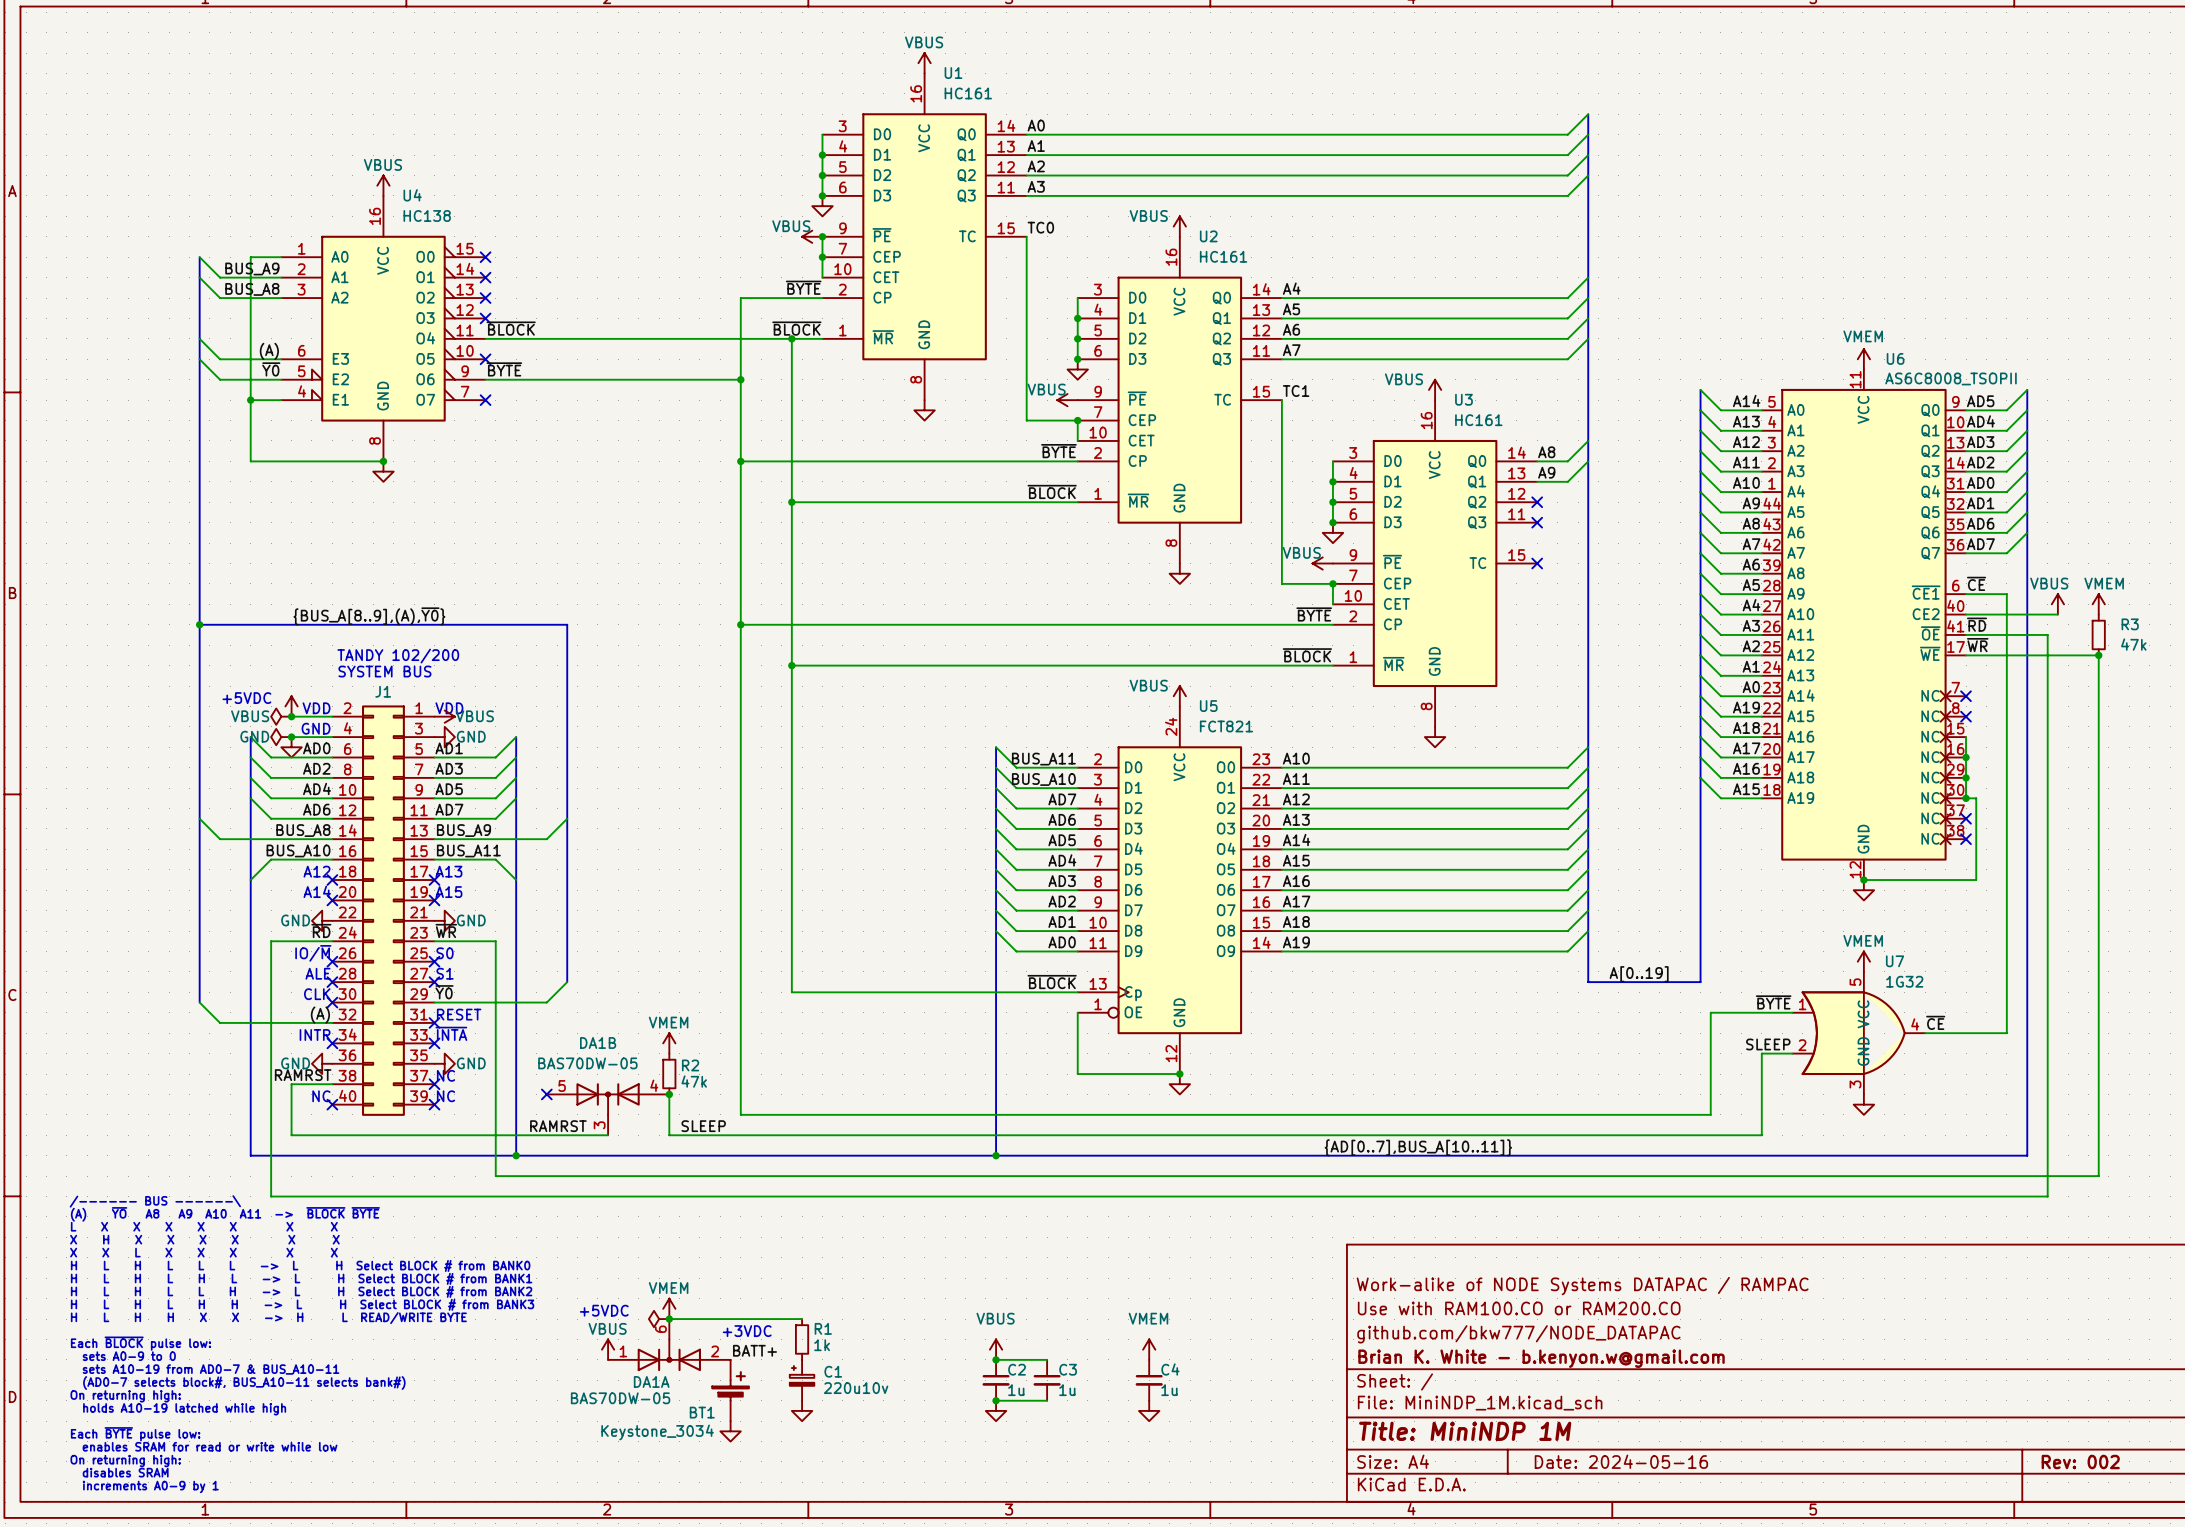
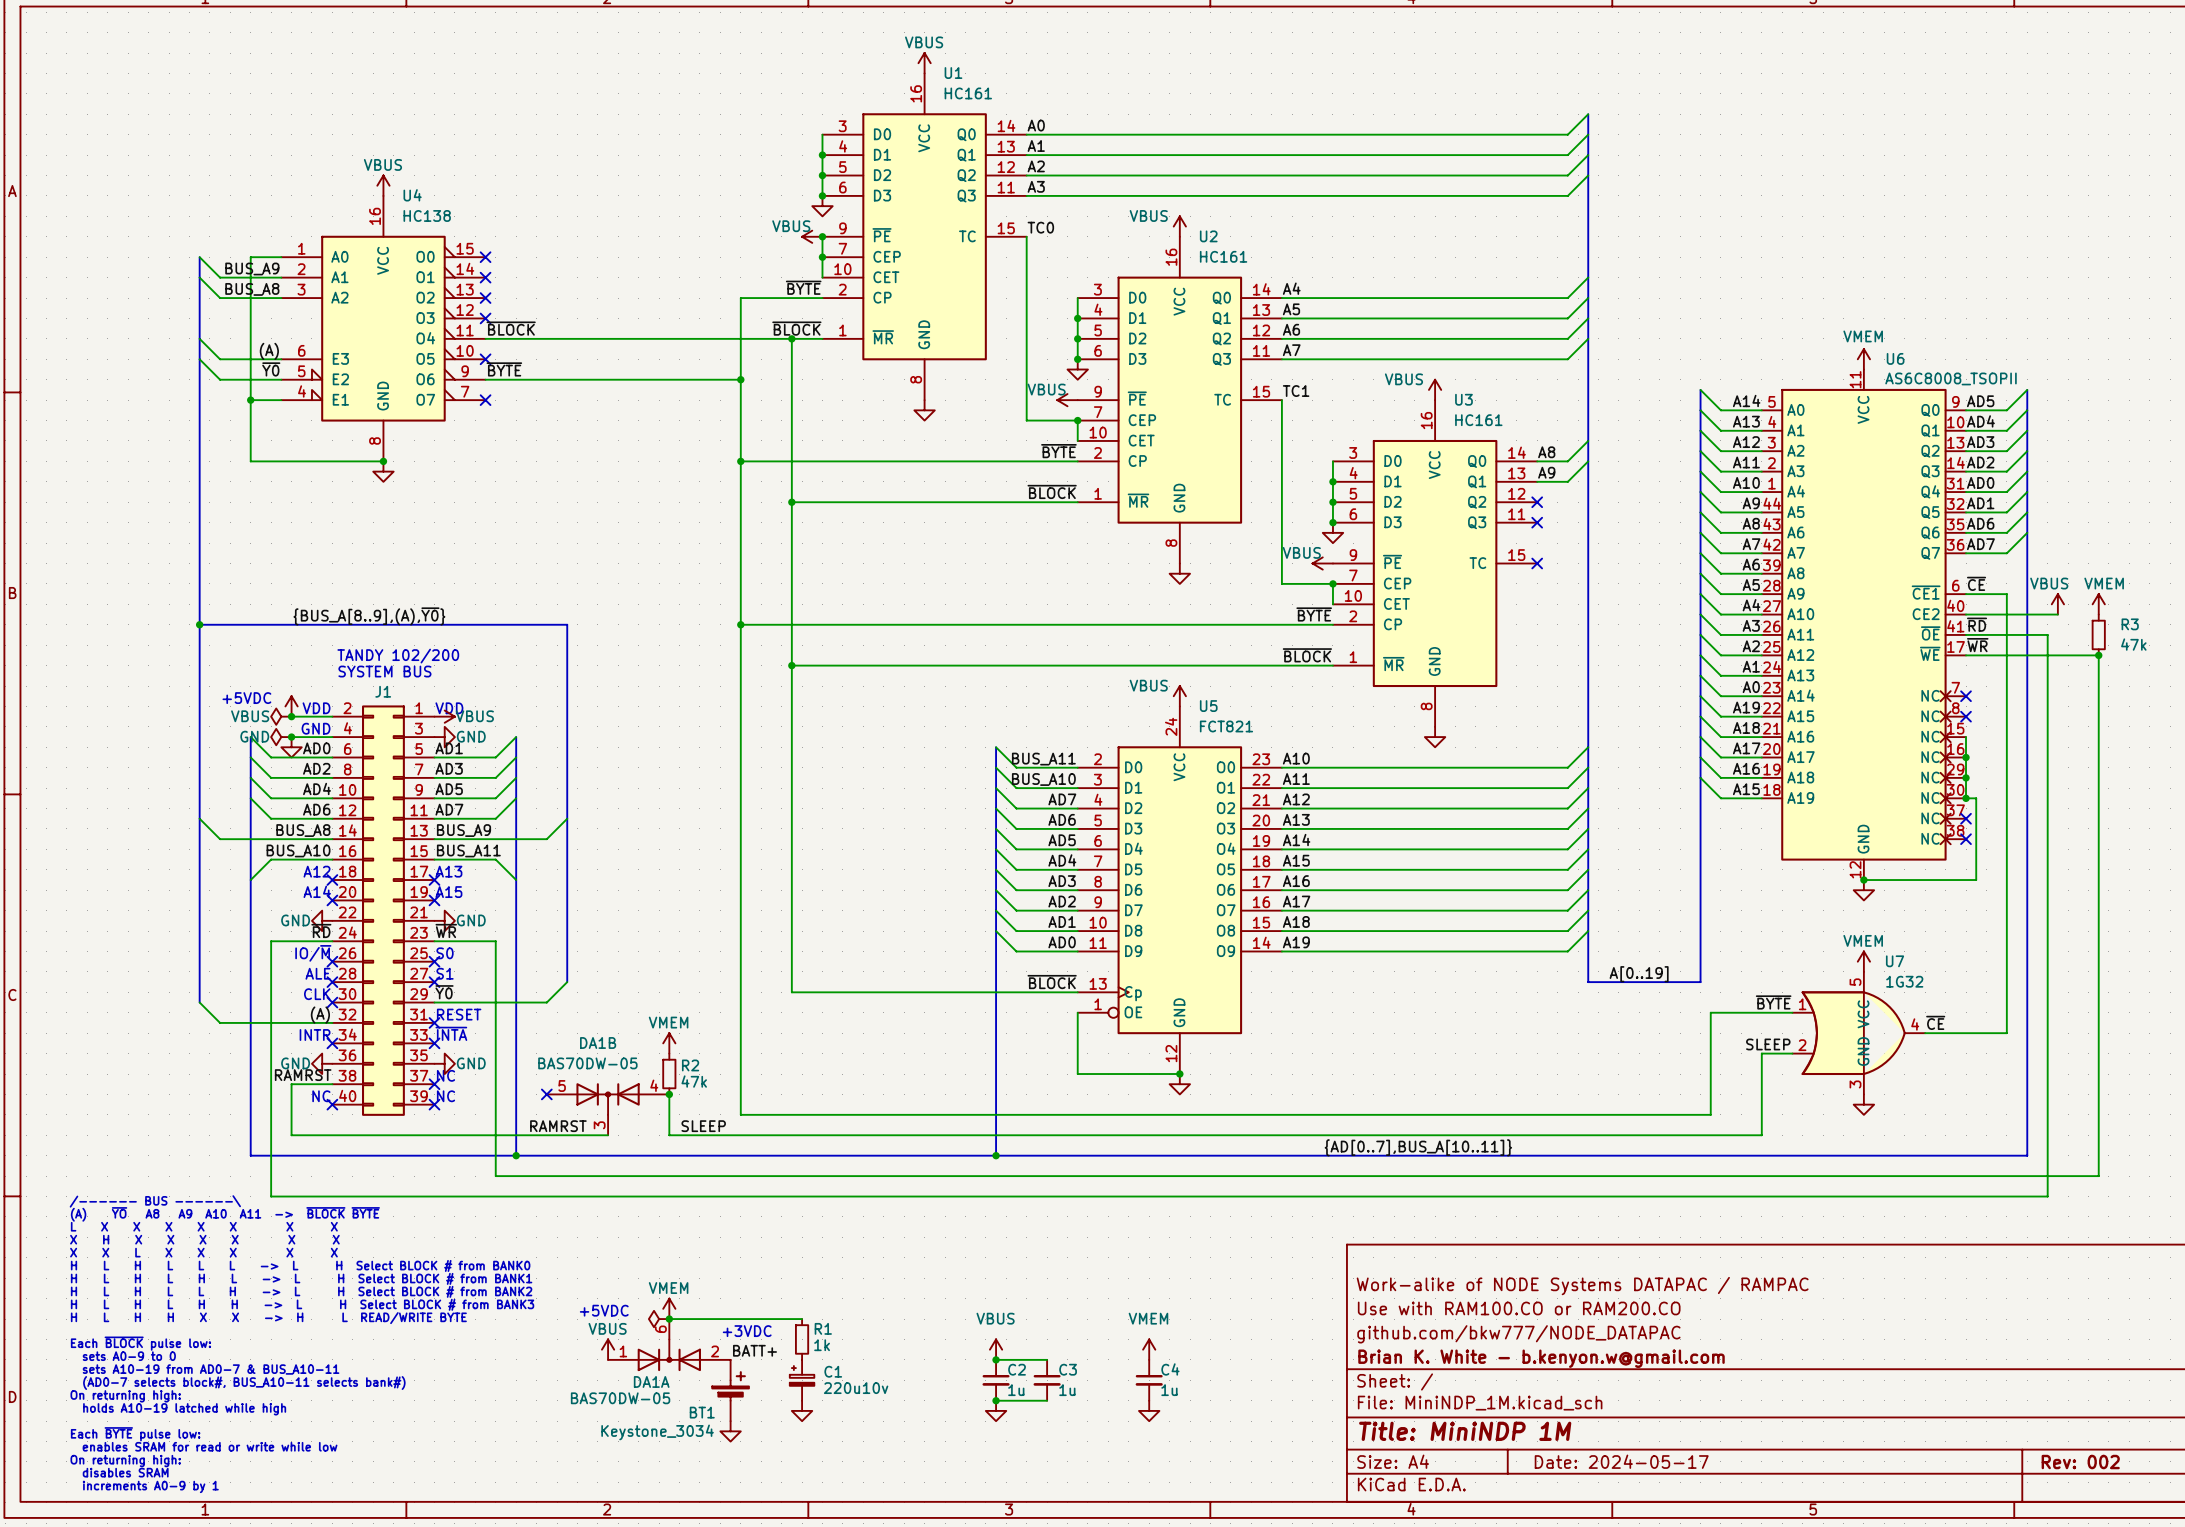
title block: Date: 2024-05-16 (1621, 1461) -> Date: 2024-05-17 (1621, 1461)

